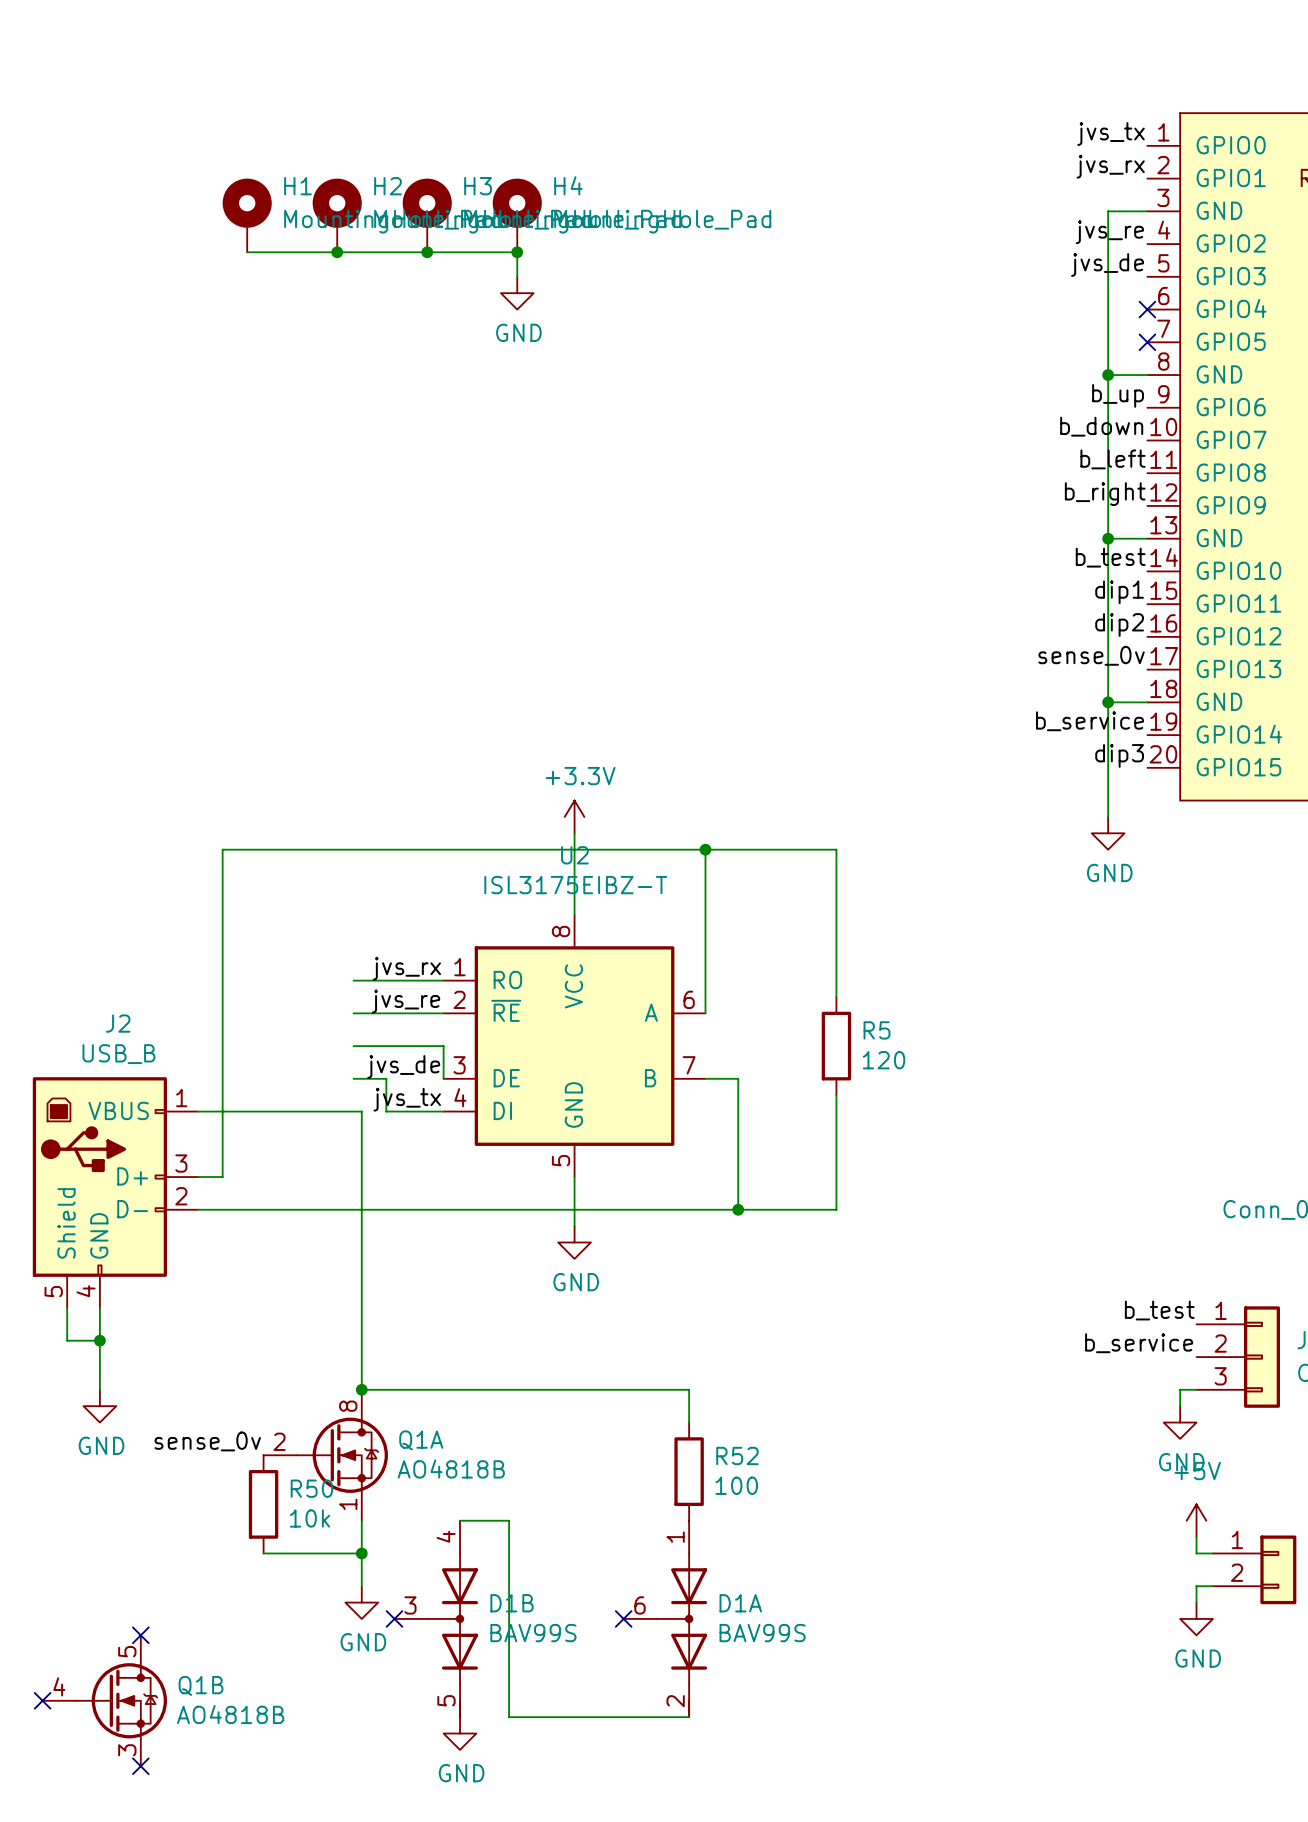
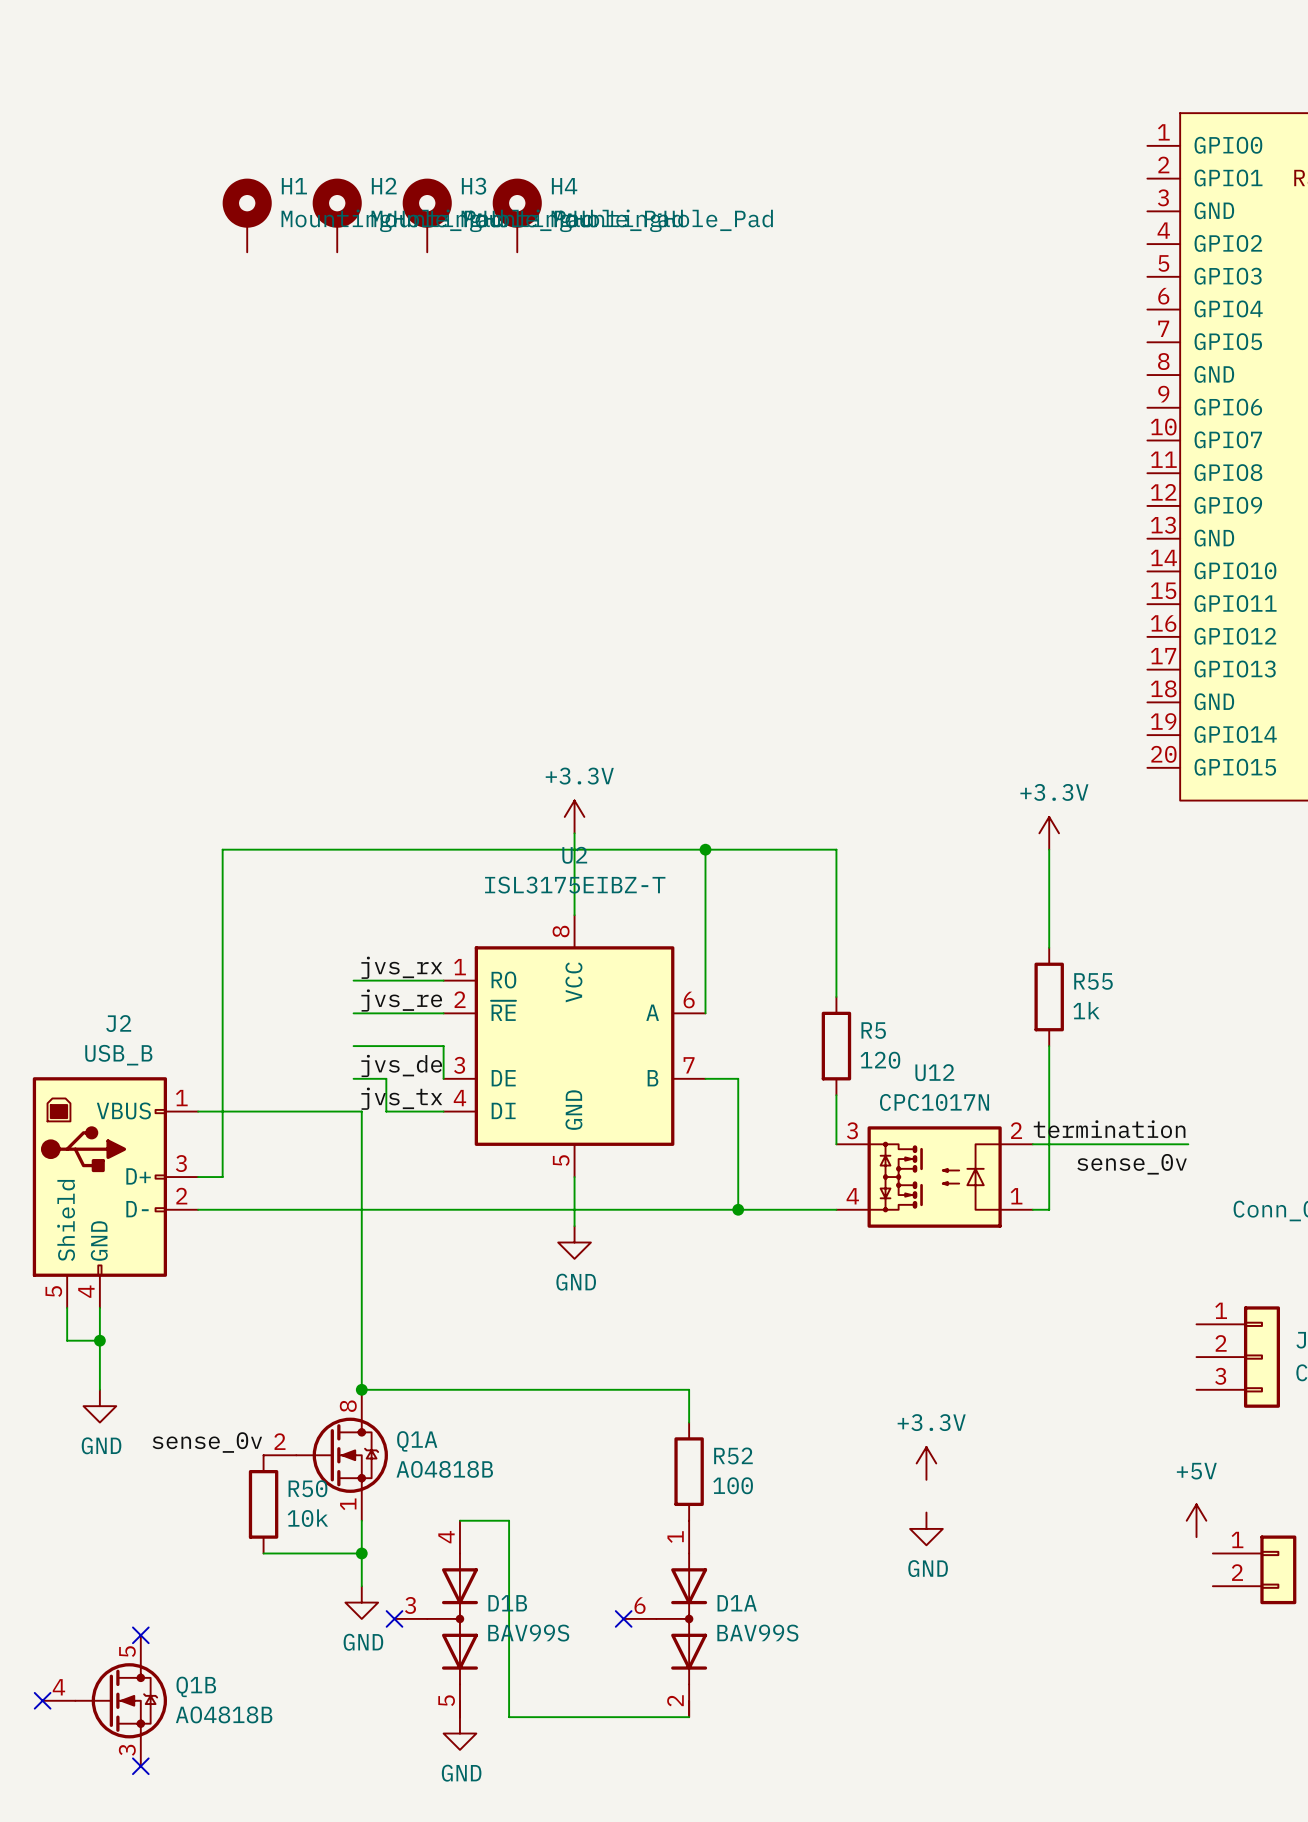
label: jvs_tx (1111, 134) -> none
label: jvs_rx (1110, 166) -> none
wire: (1147, 211) (1108, 211) (1108, 816) -> none
label: jvs_re (1109, 232) -> none
wire: (247, 252) (517, 252) (517, 276) -> none
junction: (337, 252) -> none
junction: (427, 252) -> none
junction: (517, 252) -> none
label: jvs_de (1107, 264) -> none
power symbol: GND (517, 293) -> none
no-connect mark: (1147, 309) -> none
no-connect mark: (1147, 342) -> none
wire: (1108, 375) (1147, 375) -> none
junction: (1108, 375) -> none
label: b_up (1118, 395) -> none
label: b_down (1101, 426) -> none
label: b_left (1112, 459) -> none
label: b_right (1105, 494) -> none
wire: (1108, 538) (1147, 538) -> none
junction: (1108, 538) -> none
label: b_test (1110, 557) -> none
label: dip1 (1119, 592) -> none
label: dip2 (1119, 625) -> none
label: sense_0v (1091, 655) -> none
wire: (1108, 702) (1147, 702) -> none
junction: (1108, 702) -> none
label: b_service (1090, 721) -> none
label: dip3 (1119, 755) -> none
power symbol: none -> +3.3V (1049, 833)
power symbol: GND (1108, 833) -> none
wire: none -> (1049, 849) (1049, 947)
R55: none -> 1k (1049, 996)
wire: none -> (1049, 1046) (1049, 1209) (1032, 1209)
label: none -> termination (1109, 1129)
wire: (836, 1144) (836, 1209) -> none
wire: none -> (1032, 1144) (1188, 1144)
label: none -> sense_0v (1132, 1164)
U12: none -> CPC1017N (934, 1177)
label: b_test (1159, 1310) -> none
label: b_service (1139, 1343) -> none
wire: (1196, 1389) (1180, 1389) (1180, 1406) -> none
power symbol: GND (1180, 1422) -> none
power symbol: none -> +3.3V (926, 1463)
power symbol: none -> GND (926, 1528)
wire: (1196, 1537) (1196, 1553) (1212, 1553) -> none
wire: (1212, 1586) (1196, 1586) (1196, 1602) -> none
power symbol: GND (1196, 1618) -> none

